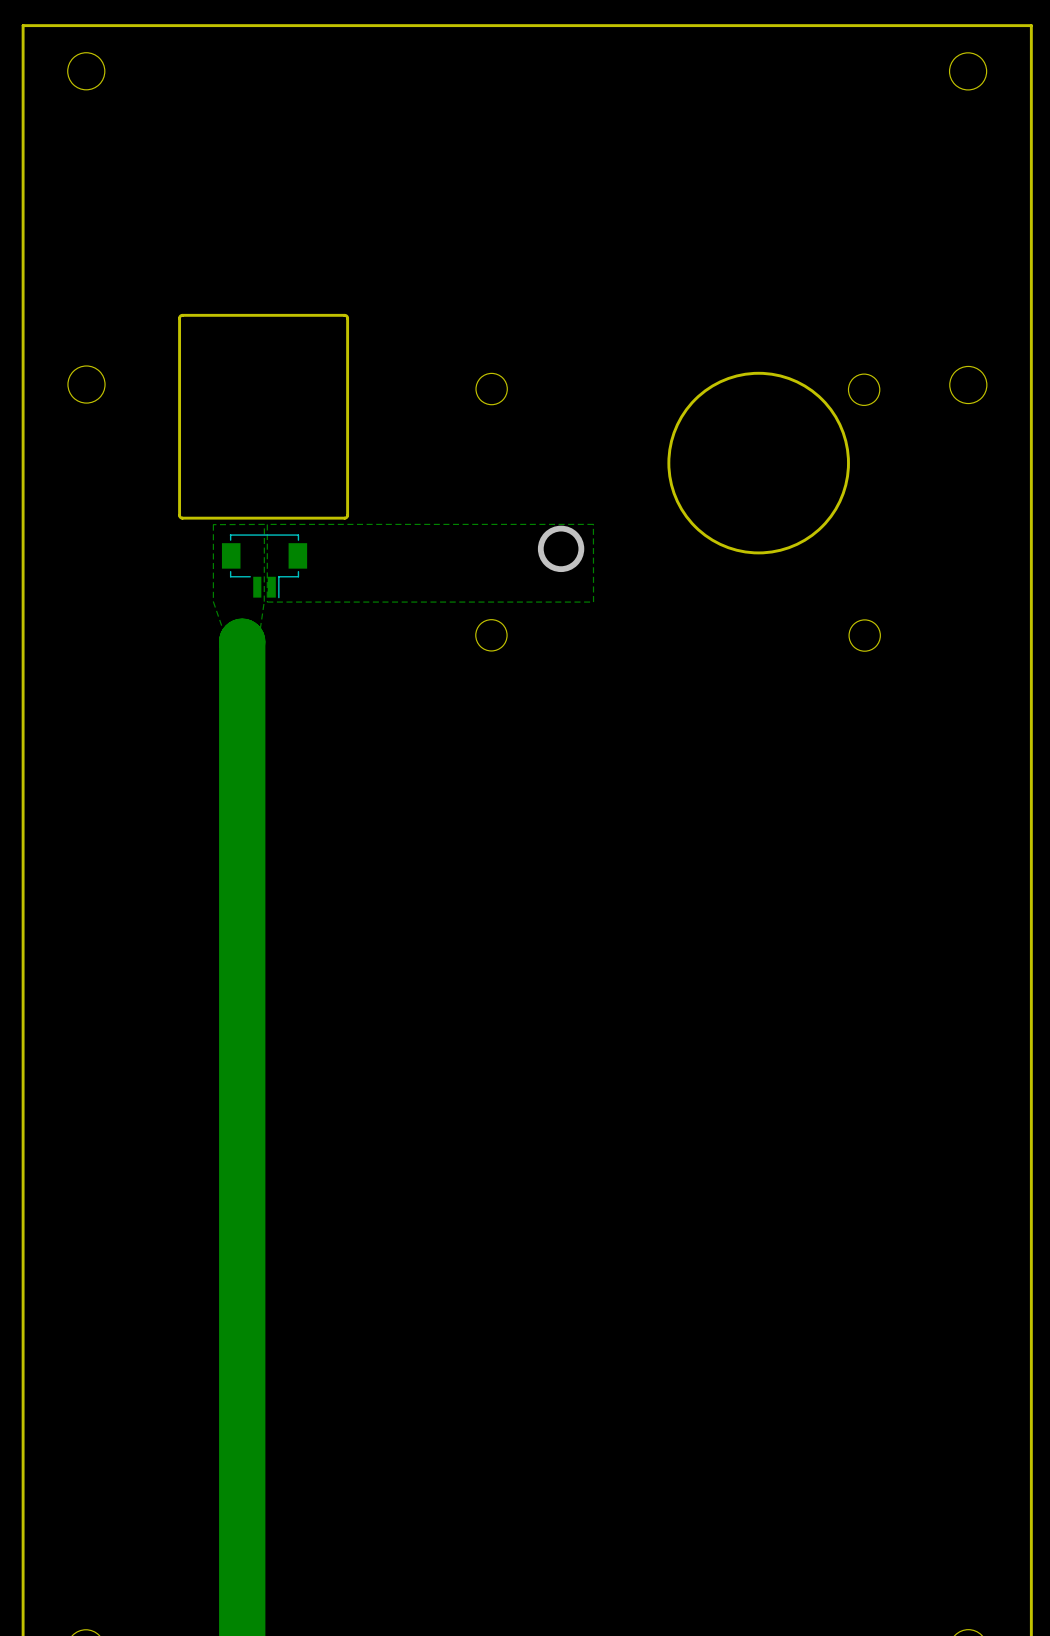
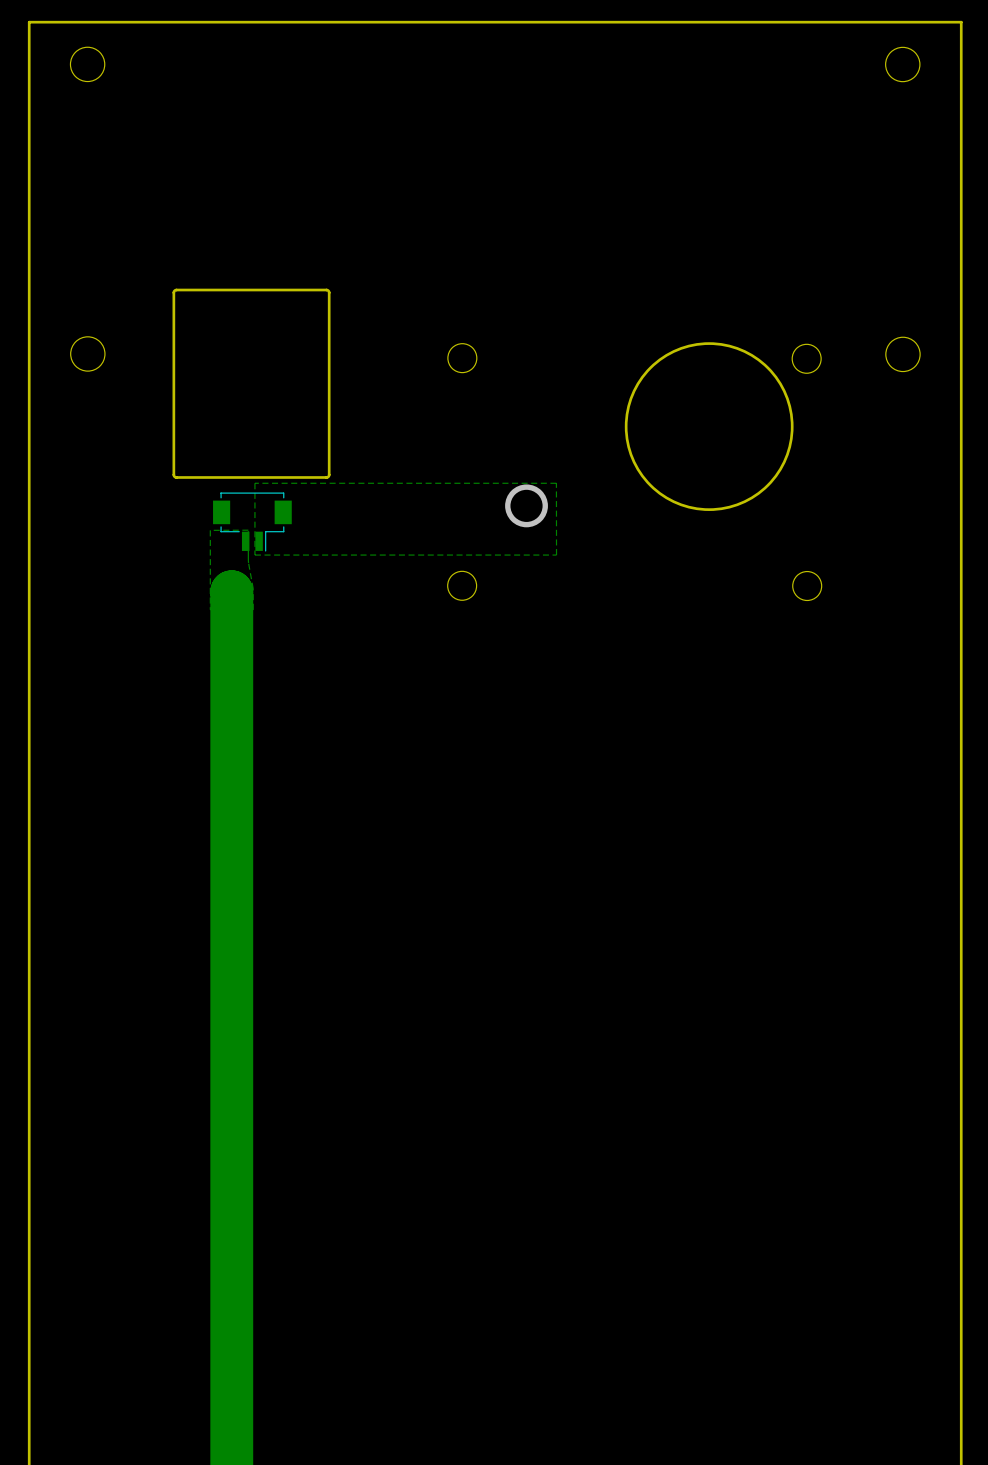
zone outline: (264, 524) (213, 524) (213, 601) (225, 637) (258, 638) (264, 601) (264, 524) -> none
zone outline: none -> (248, 530) (210, 530) (210, 609) (253, 609) (253, 588) (248, 561) (248, 530)

